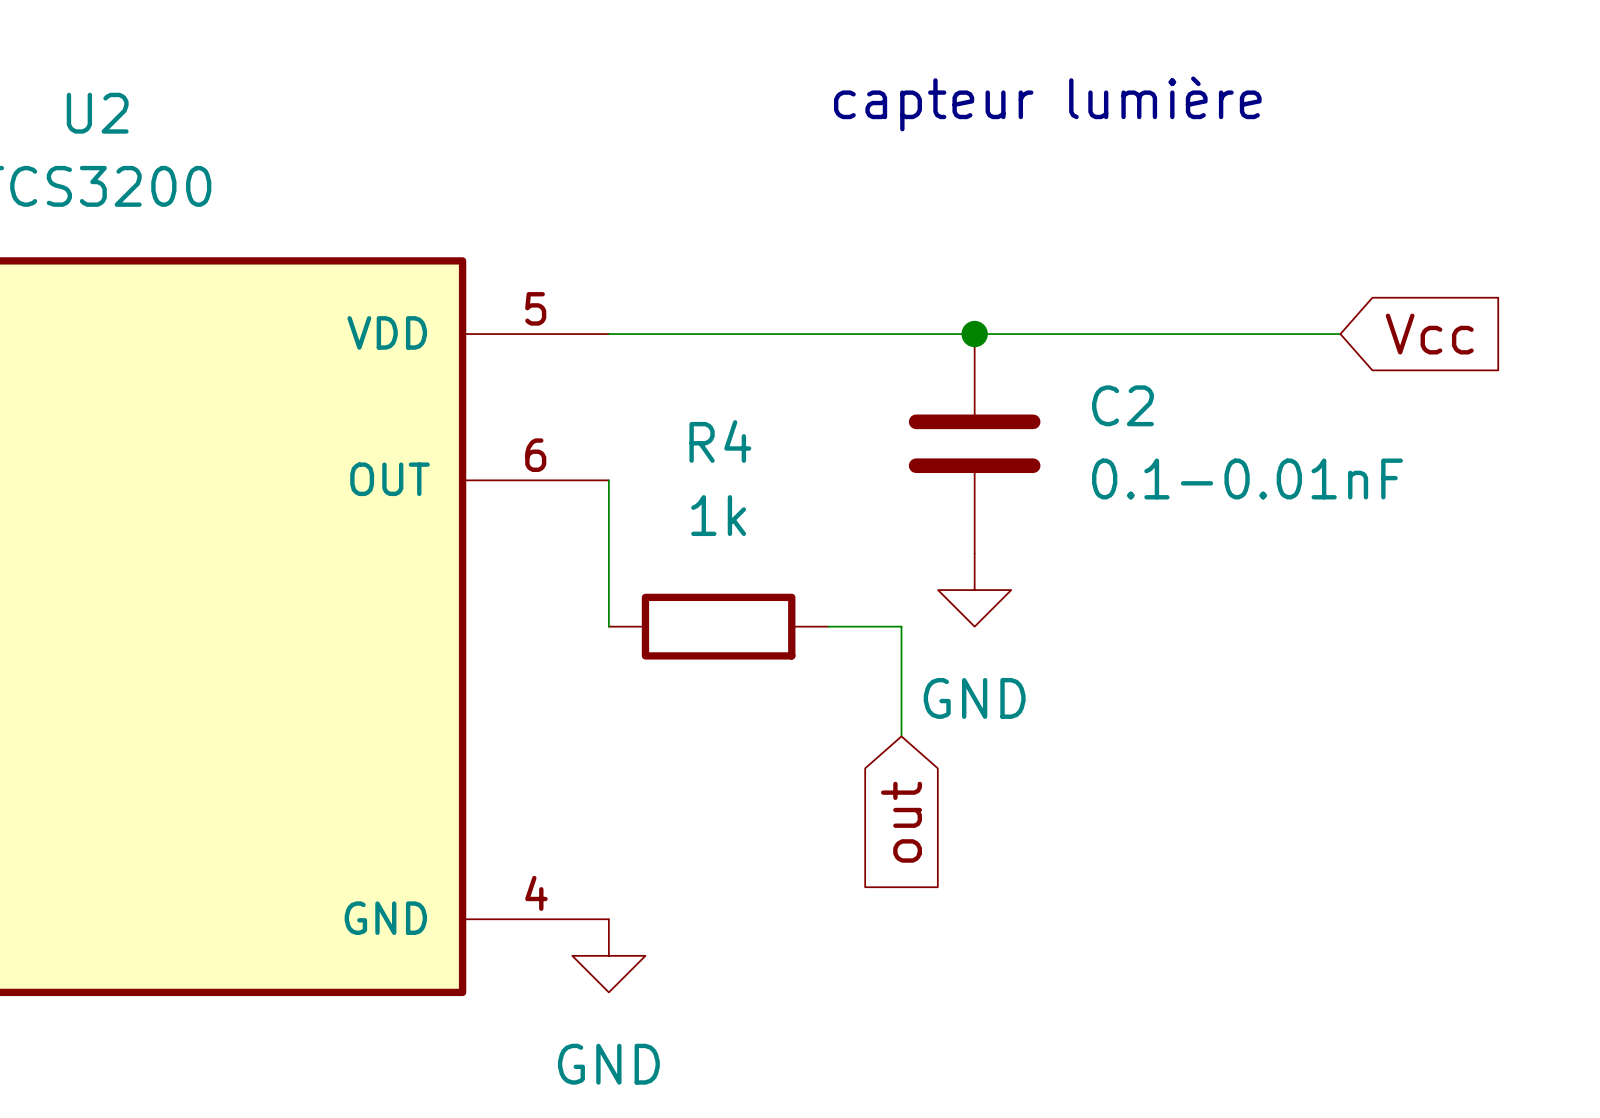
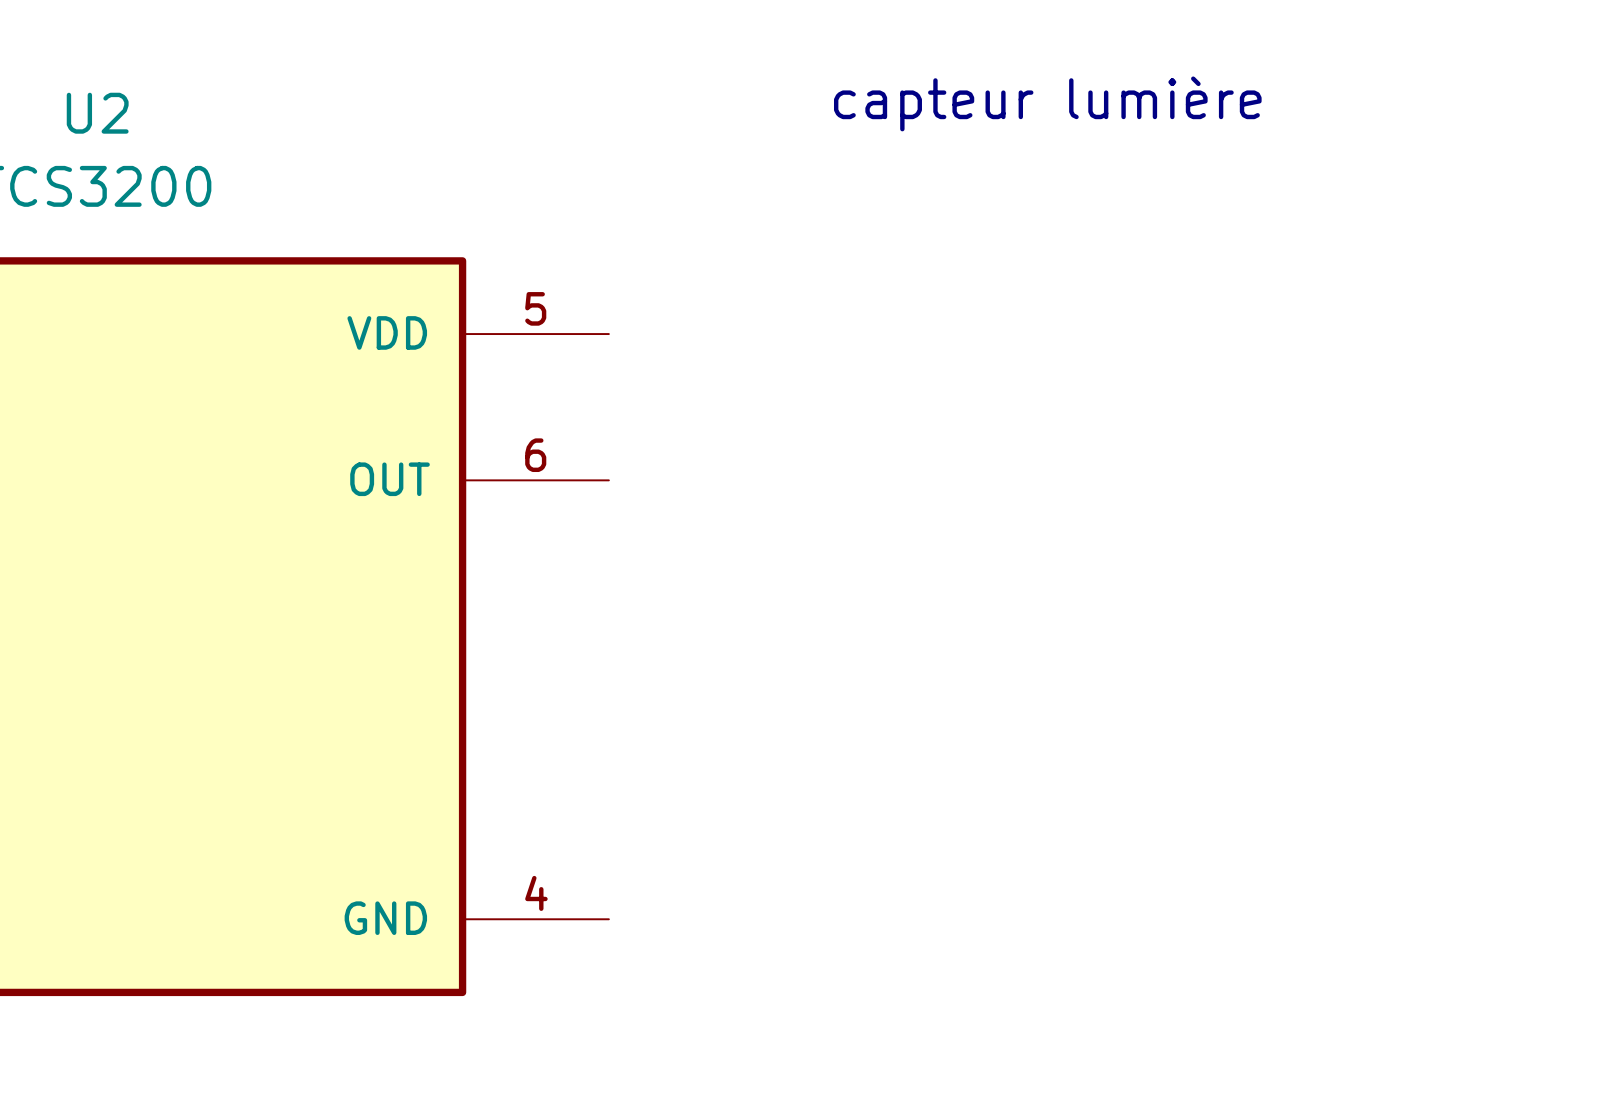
wire: (608, 334) (1340, 334) -> none
junction: (974, 334) -> none
global label: Vcc (1429, 334) -> none
C2: 0.1-0.01nF (974, 443) -> none
wire: (608, 480) (608, 626) -> none
power symbol: GND (974, 590) -> none
R4: 1k (718, 626) -> none
wire: (828, 626) (901, 626) (901, 736) -> none
global label: out (901, 822) -> none
power symbol: GND (608, 955) -> none

